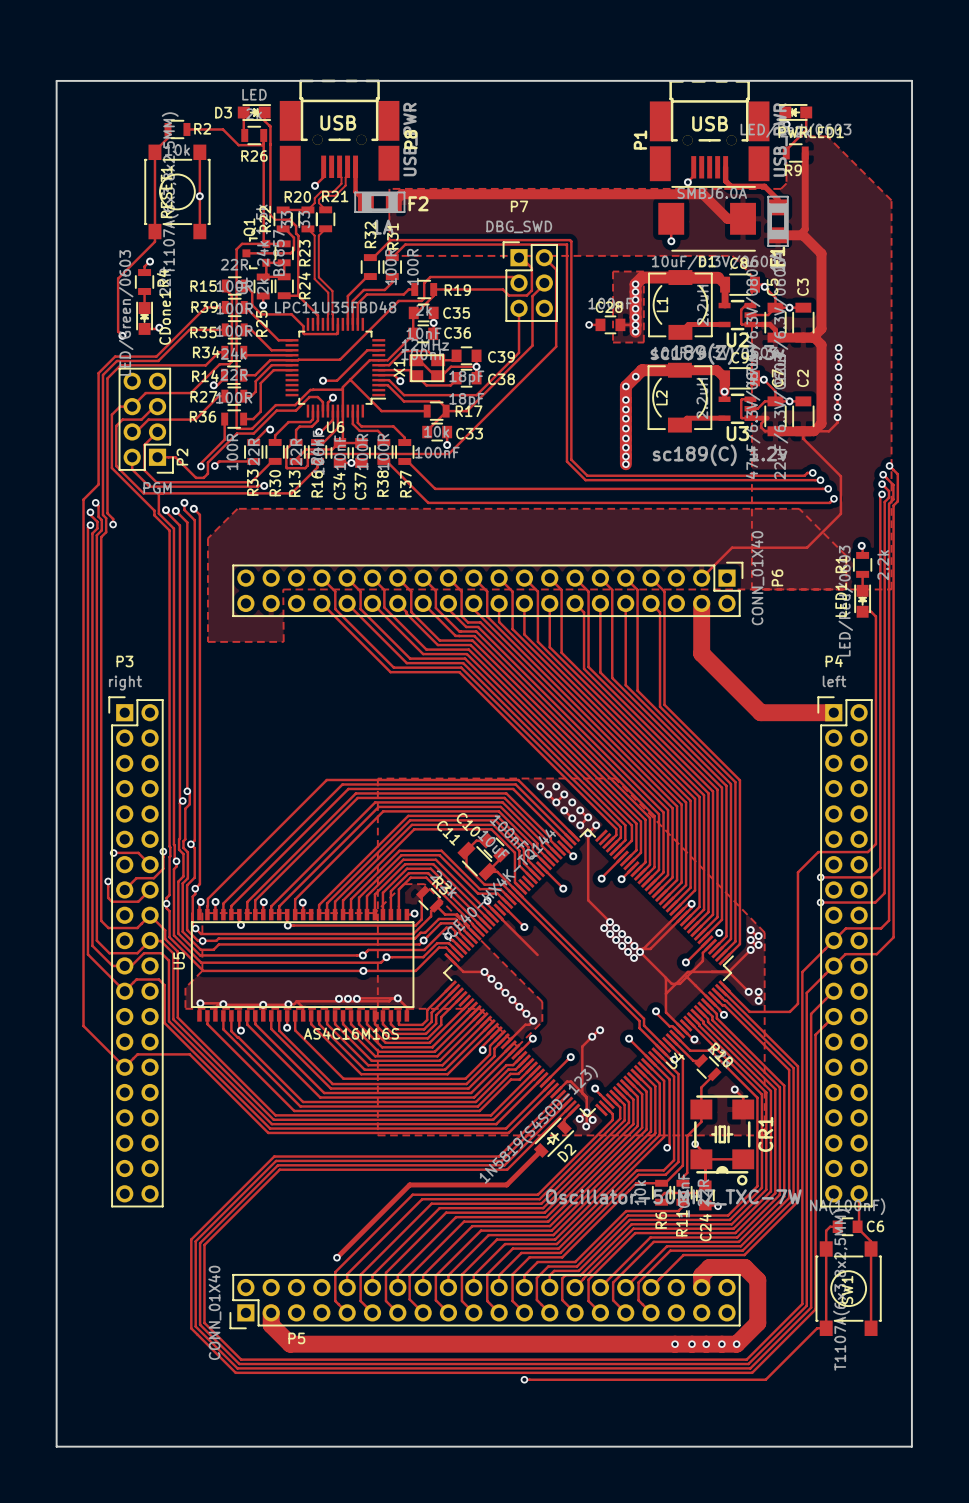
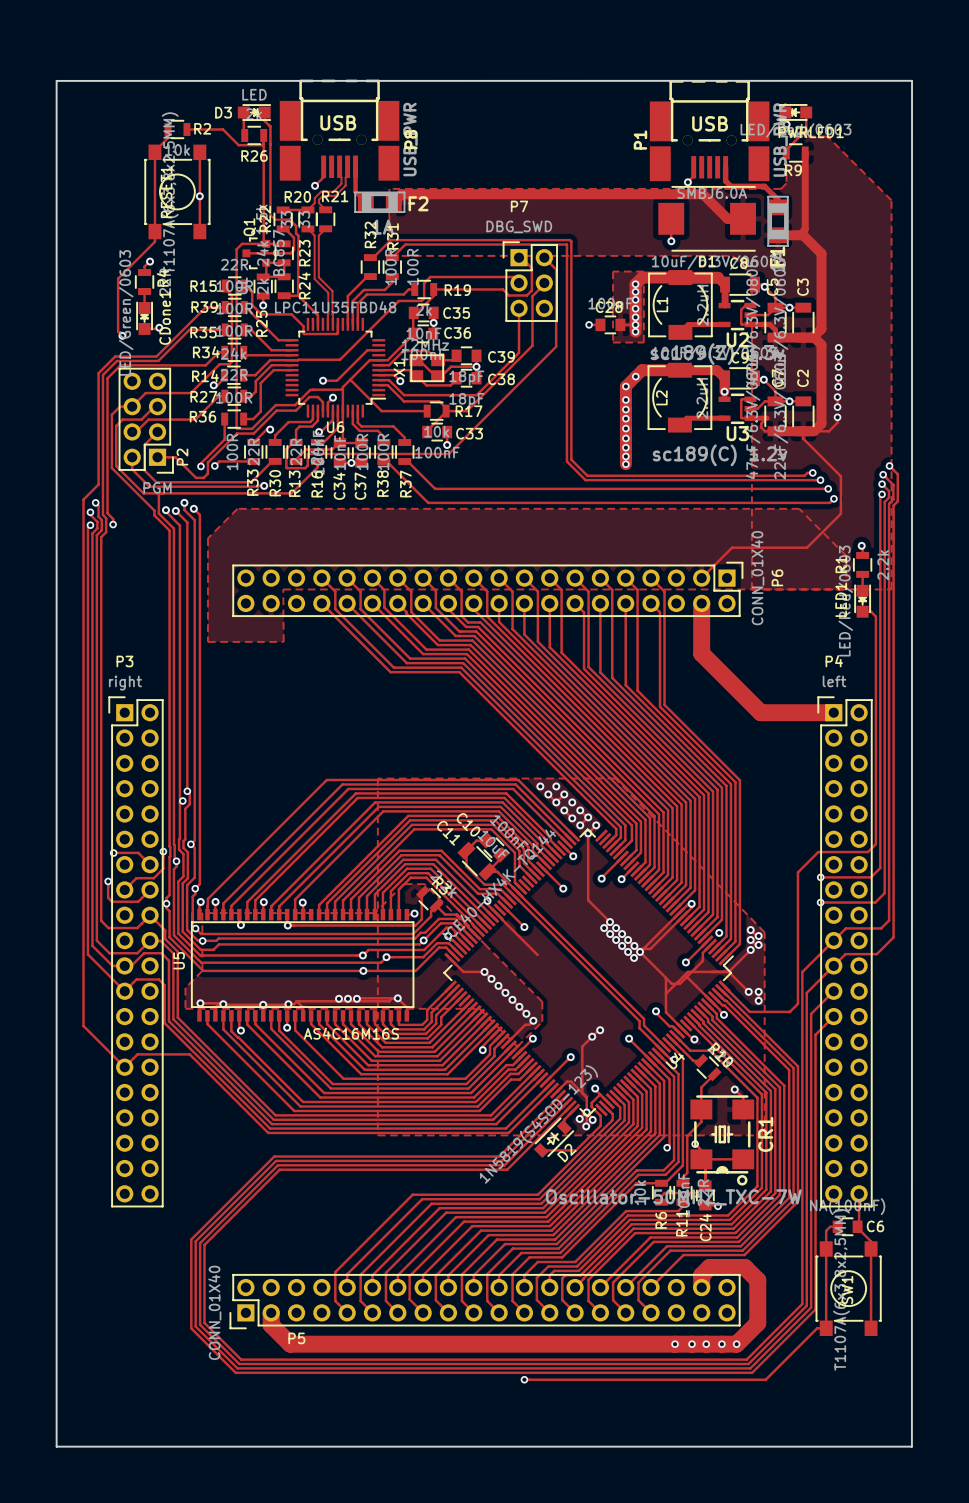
track: (541, 1150) (506, 1184) (409, 1184) (336, 1257) -> (541, 1150) (576, 1150) (600, 1125) (600, 1115) (591, 1106) (591, 1102) (600, 1094)
via: (336, 1257) -> none

